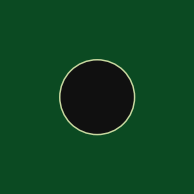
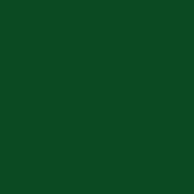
hole: (97, 97) -> none

